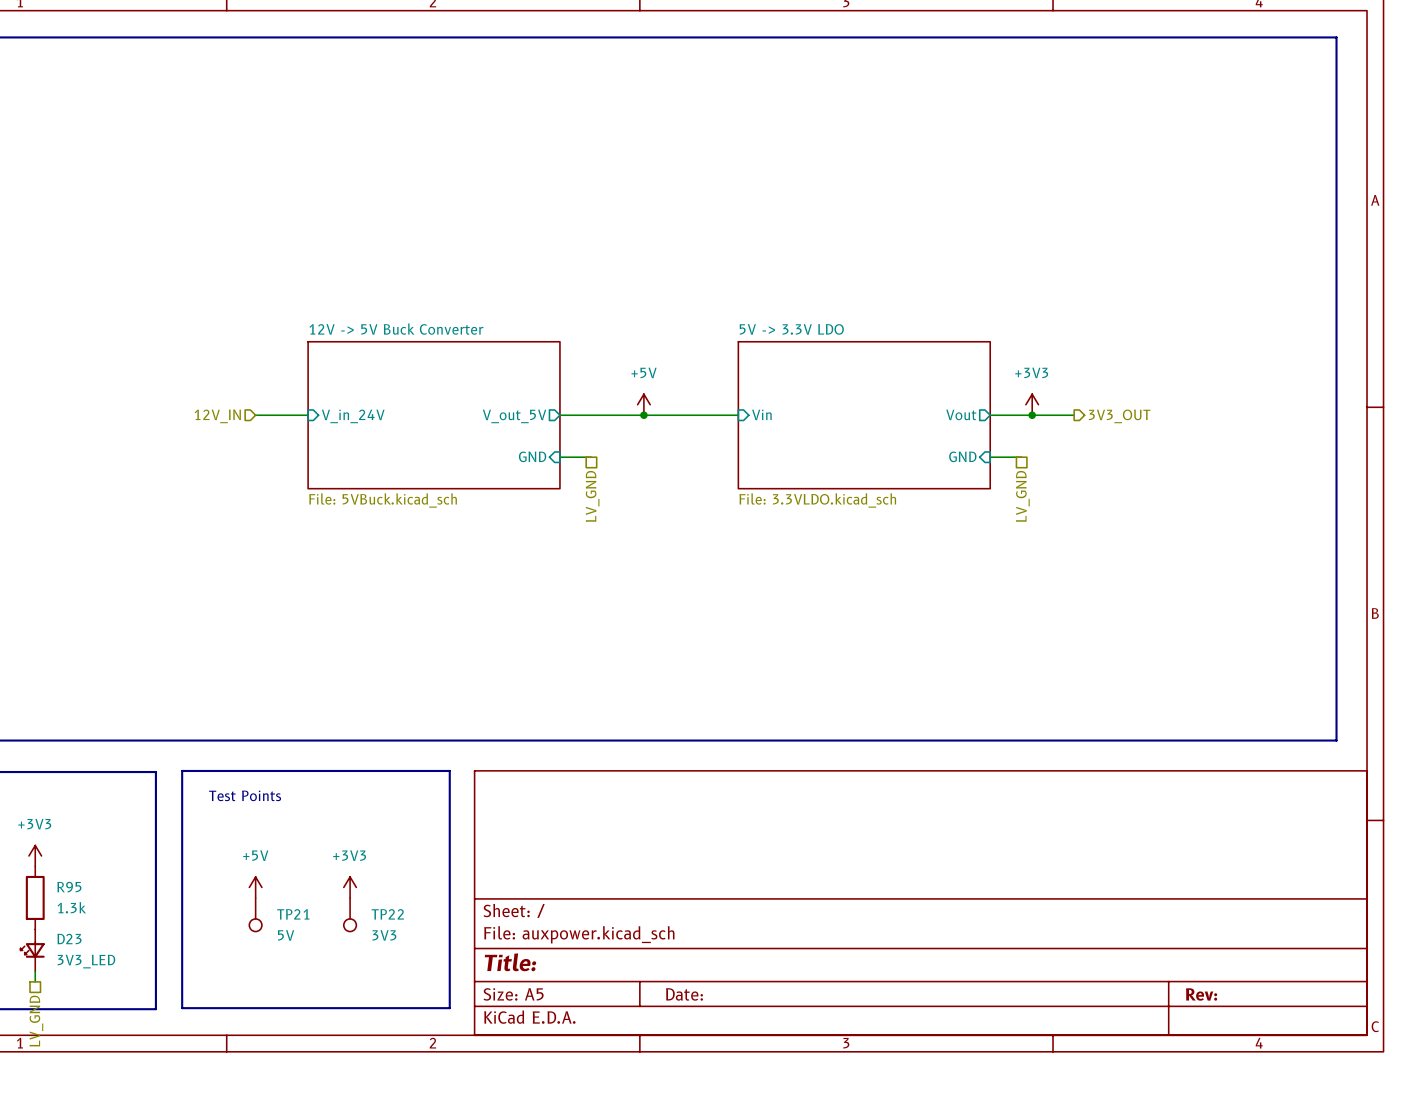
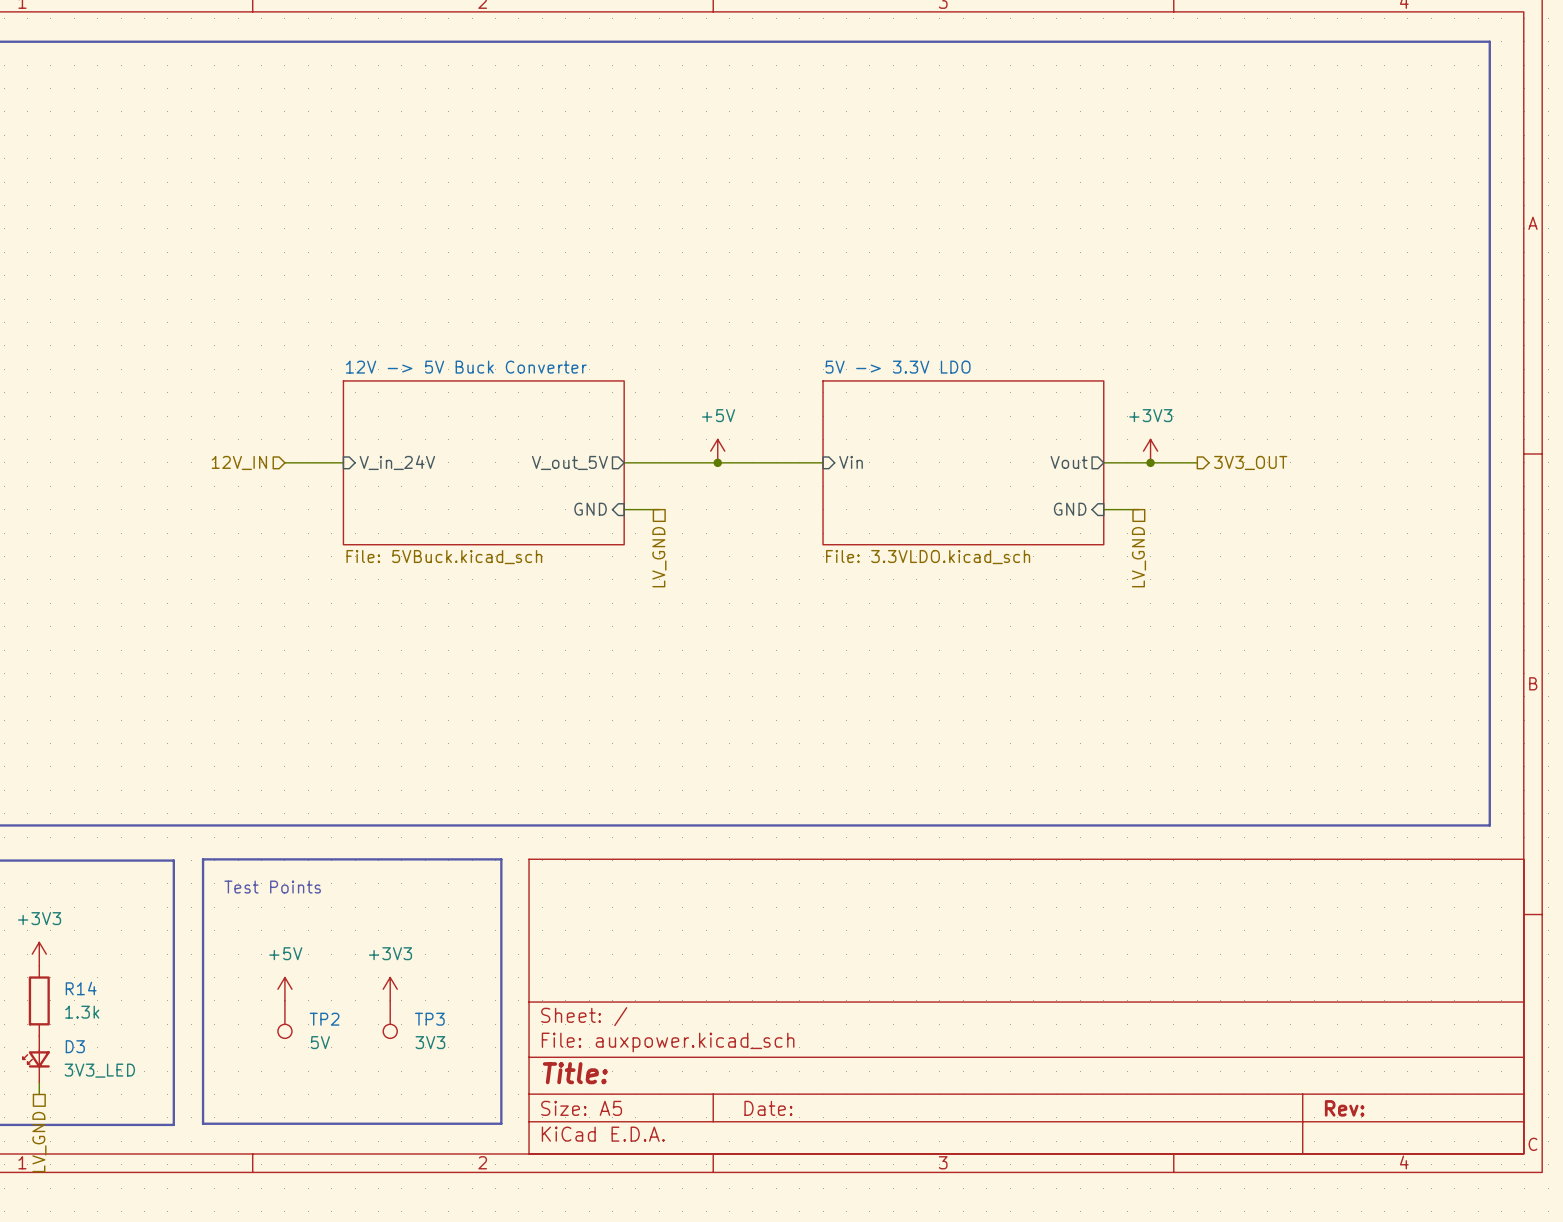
R95 name: R95 (69, 887) -> R14 (81, 988)
TP21 name: TP21 (293, 914) -> TP2 (324, 1019)
TP22 name: TP22 (387, 914) -> TP3 (429, 1019)
D23 name: D23 (69, 939) -> D3 (75, 1046)

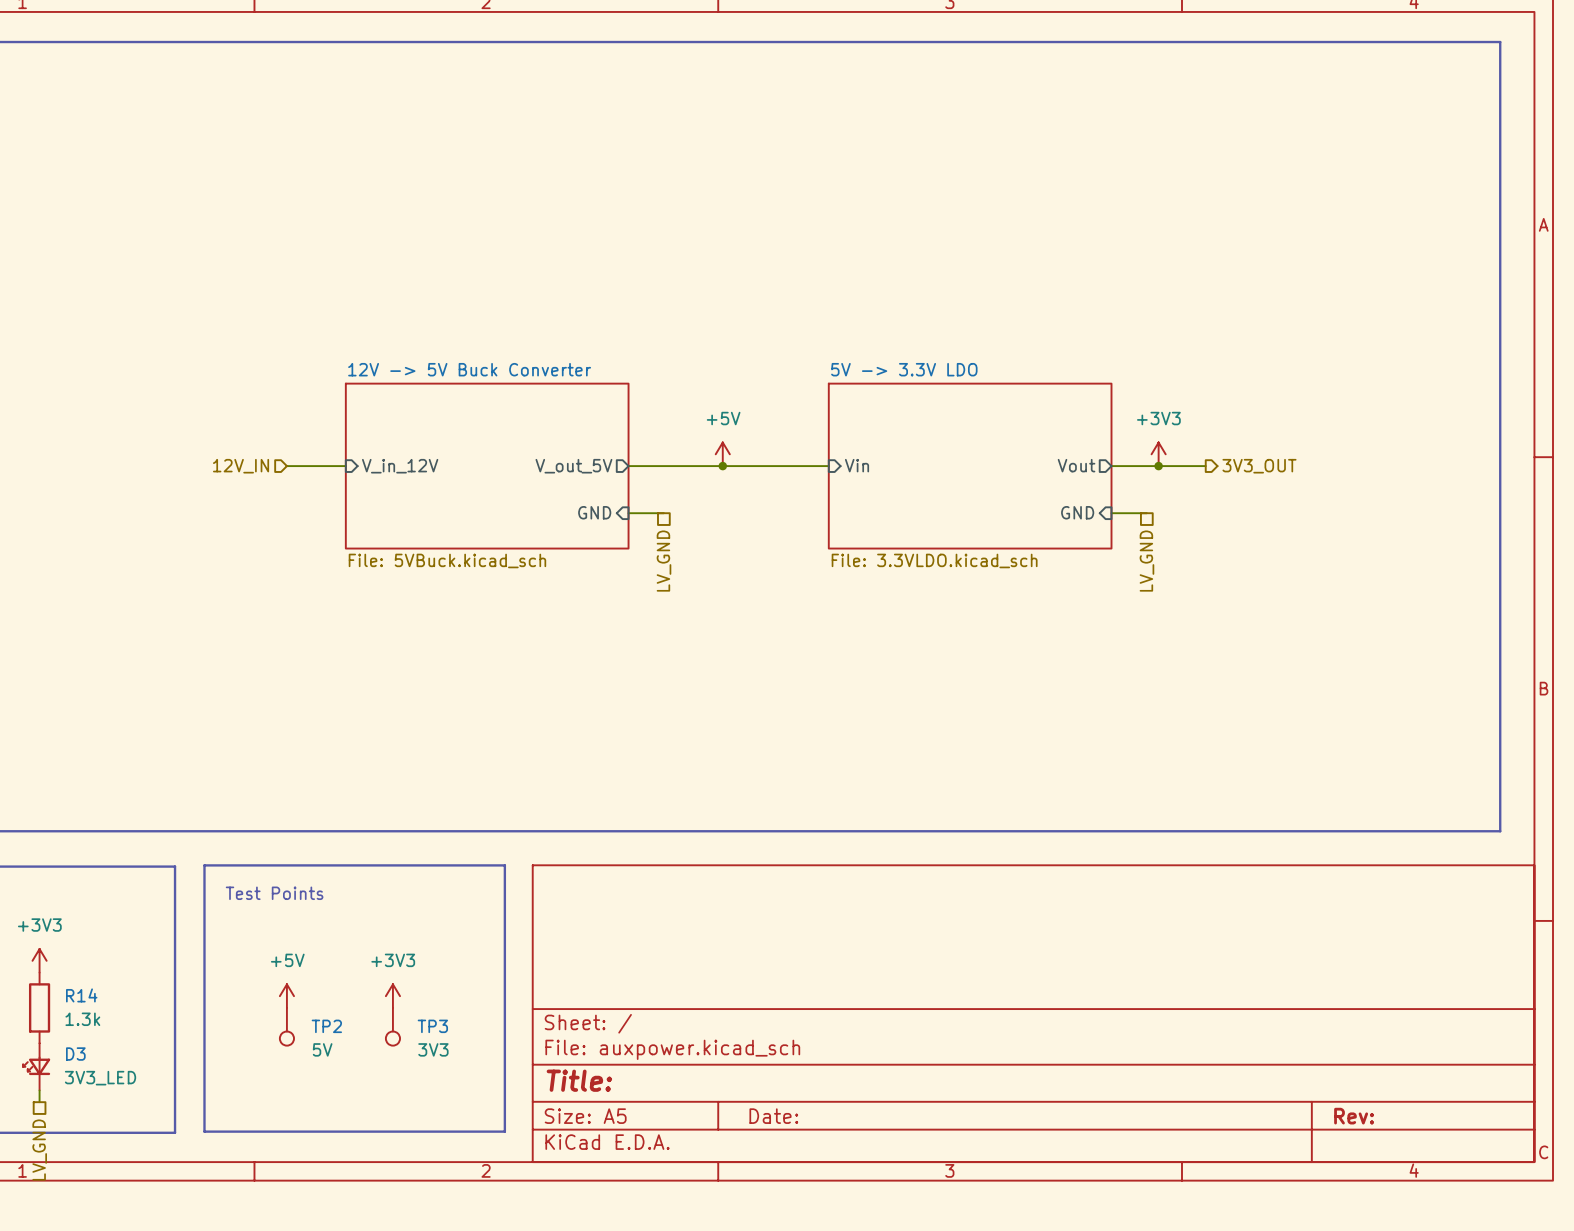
sheet pin: V_in_24V (397, 462) -> V_in_12V (400, 466)

